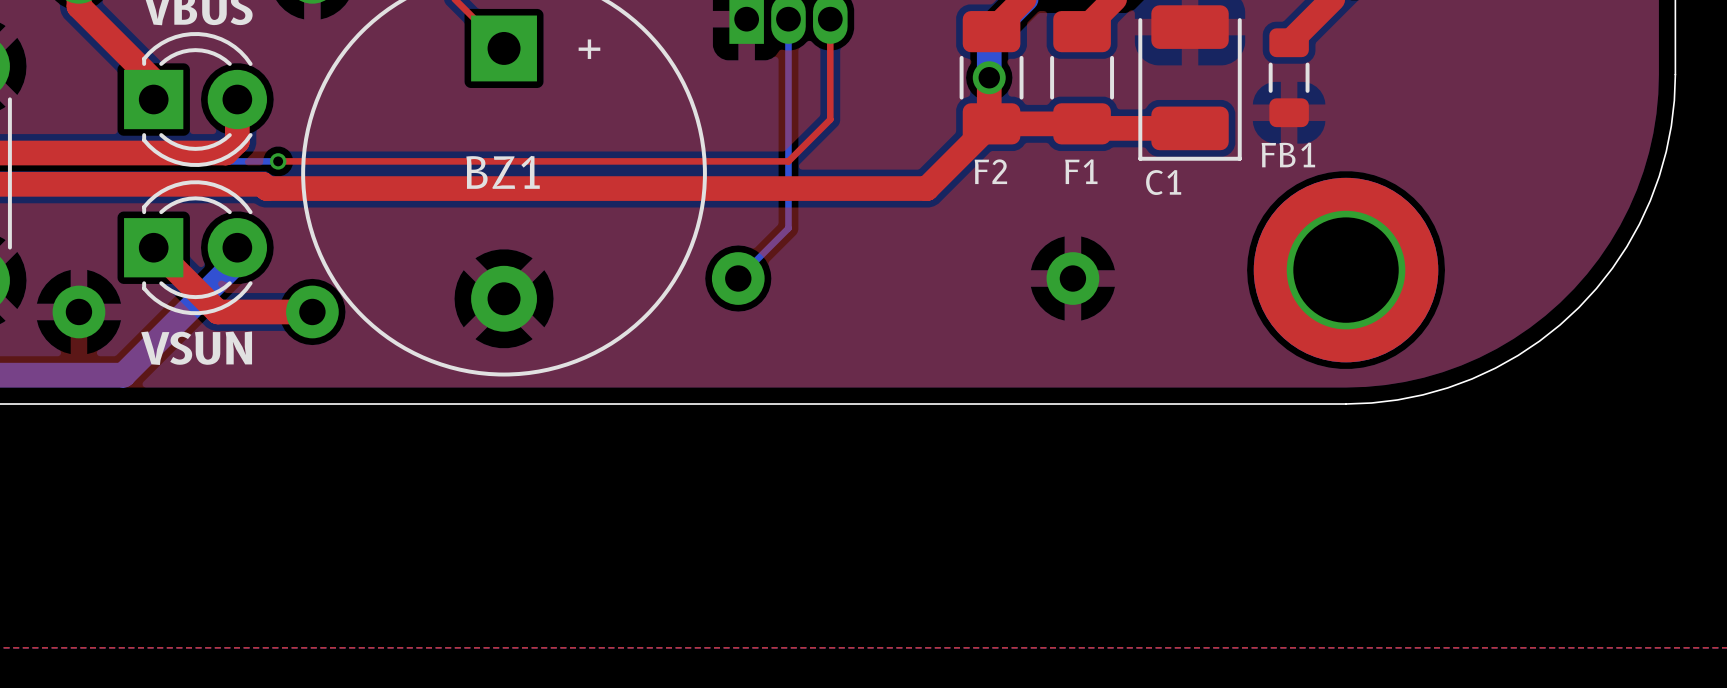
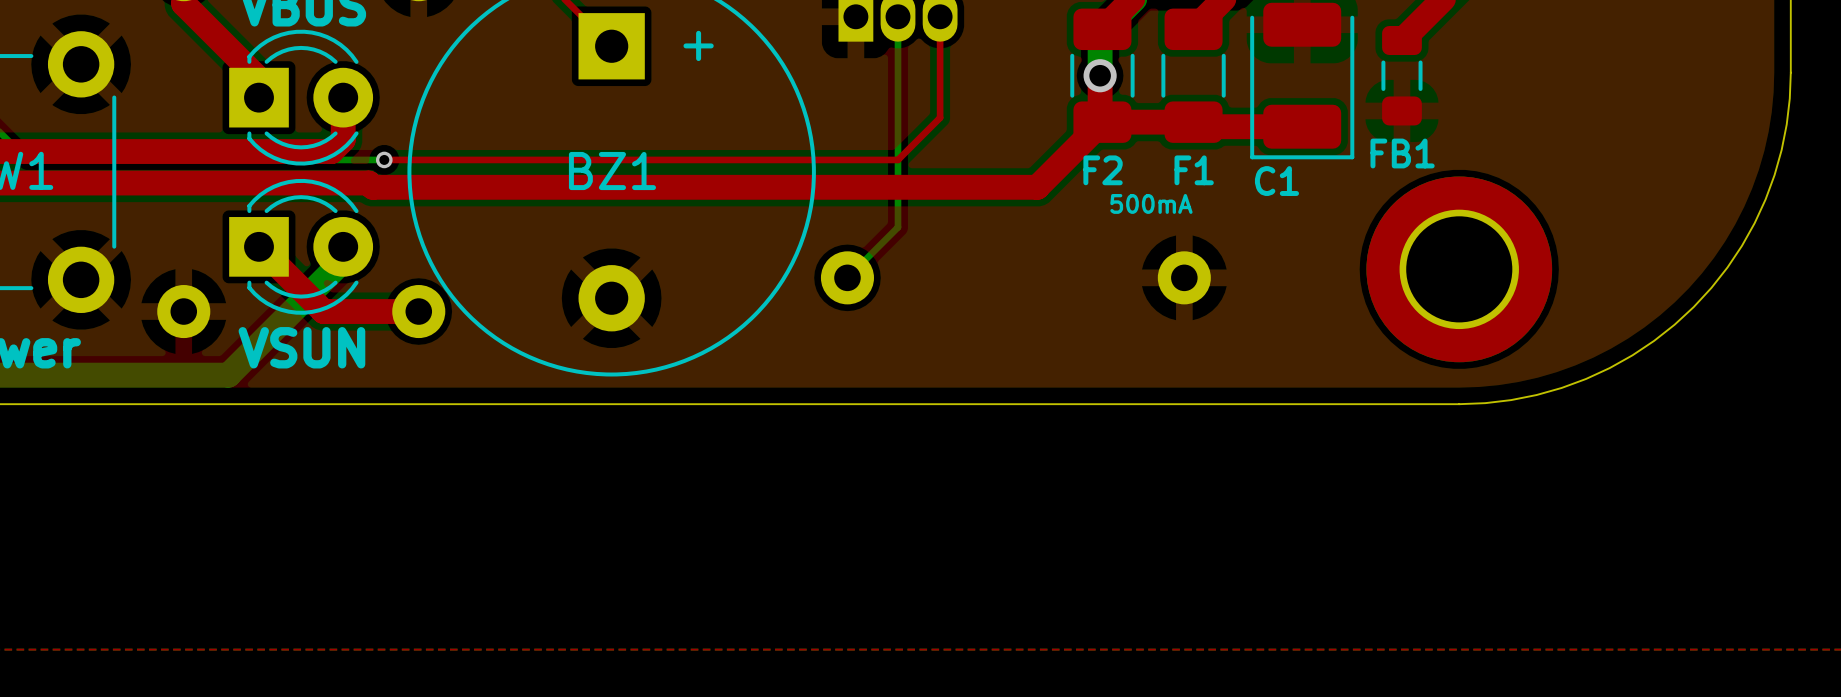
text: none -> 500mA (1151, 203)

